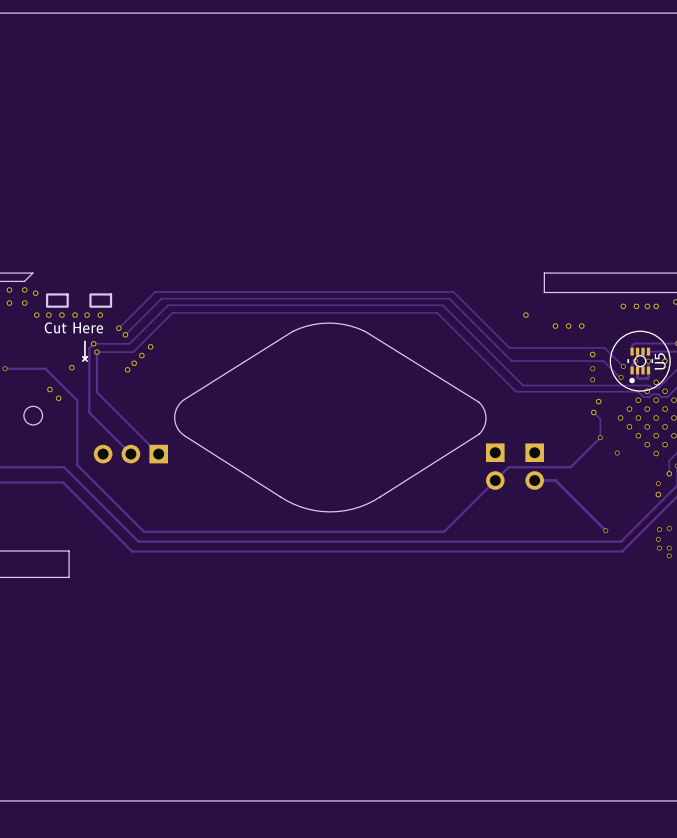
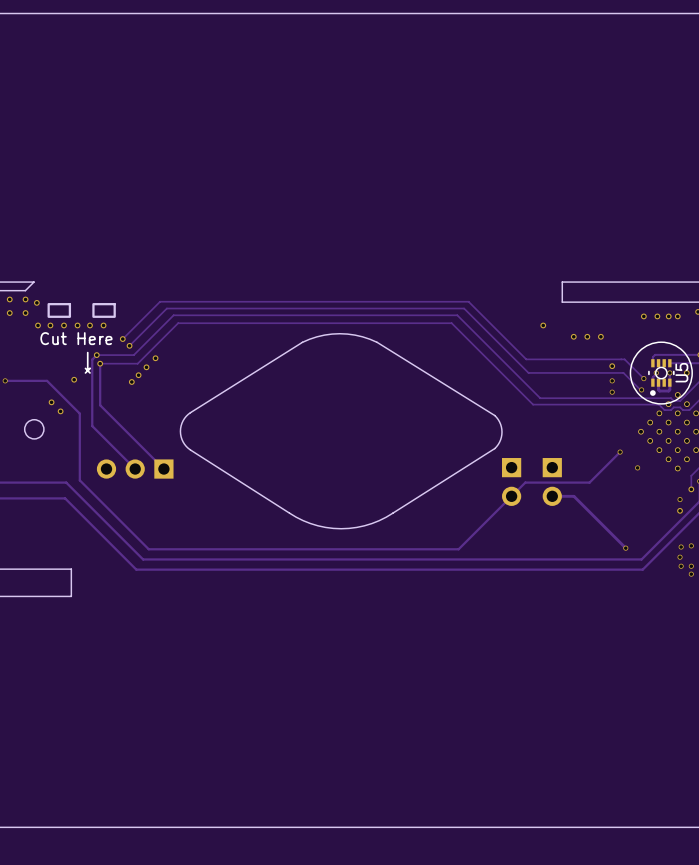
via: (598, 401) -> none
track: (593, 412) (600, 419) (600, 437) -> none
via: (593, 412) -> none

